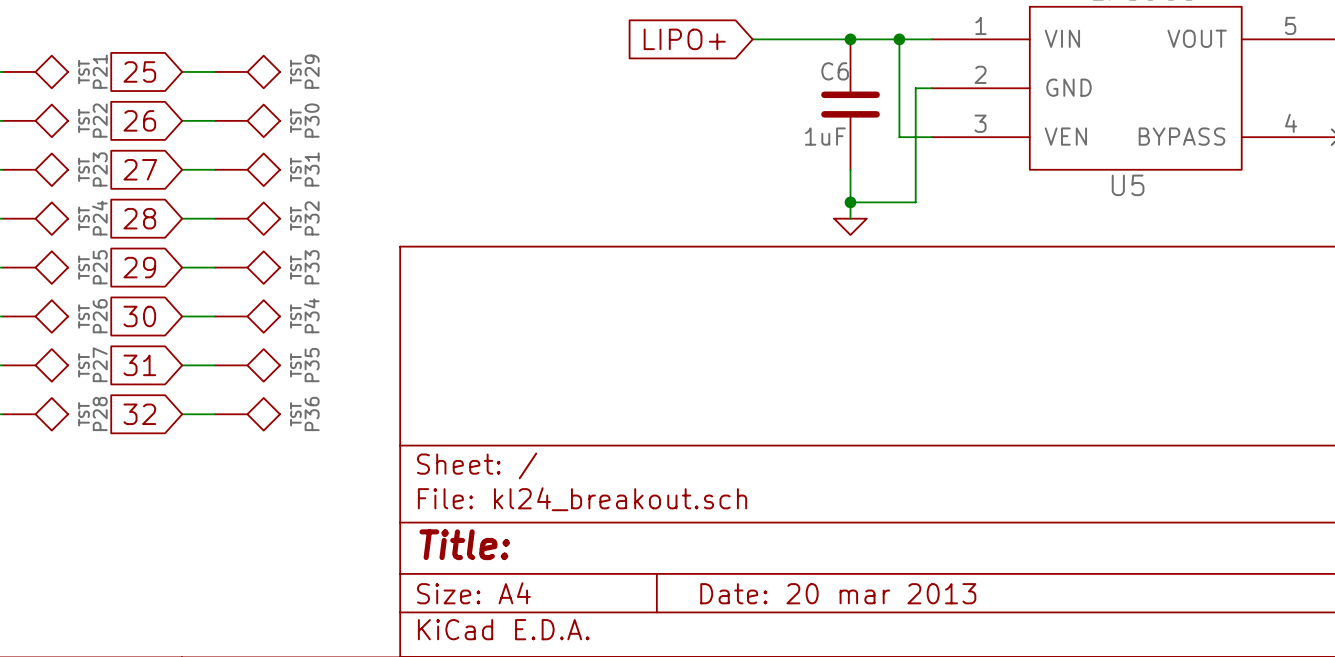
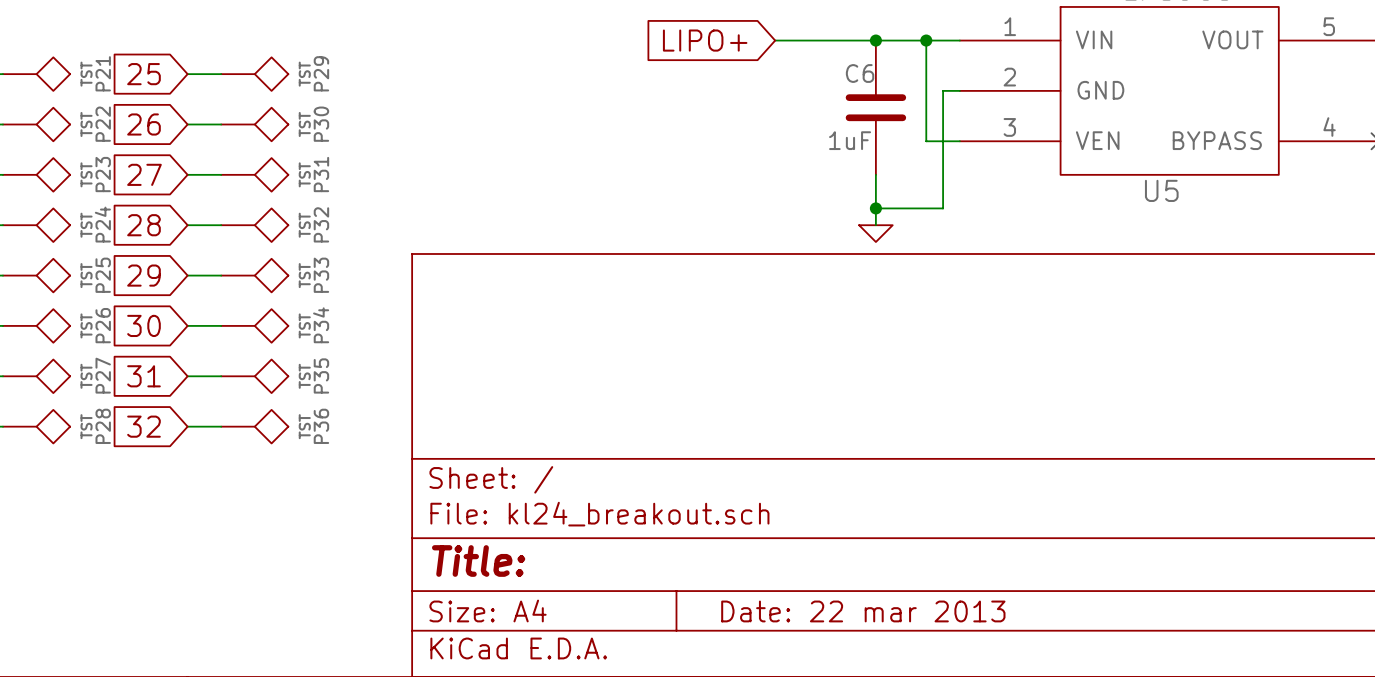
title block: Date: 20 mar 2013 (838, 593) -> Date: 22 mar 2013 (863, 611)

